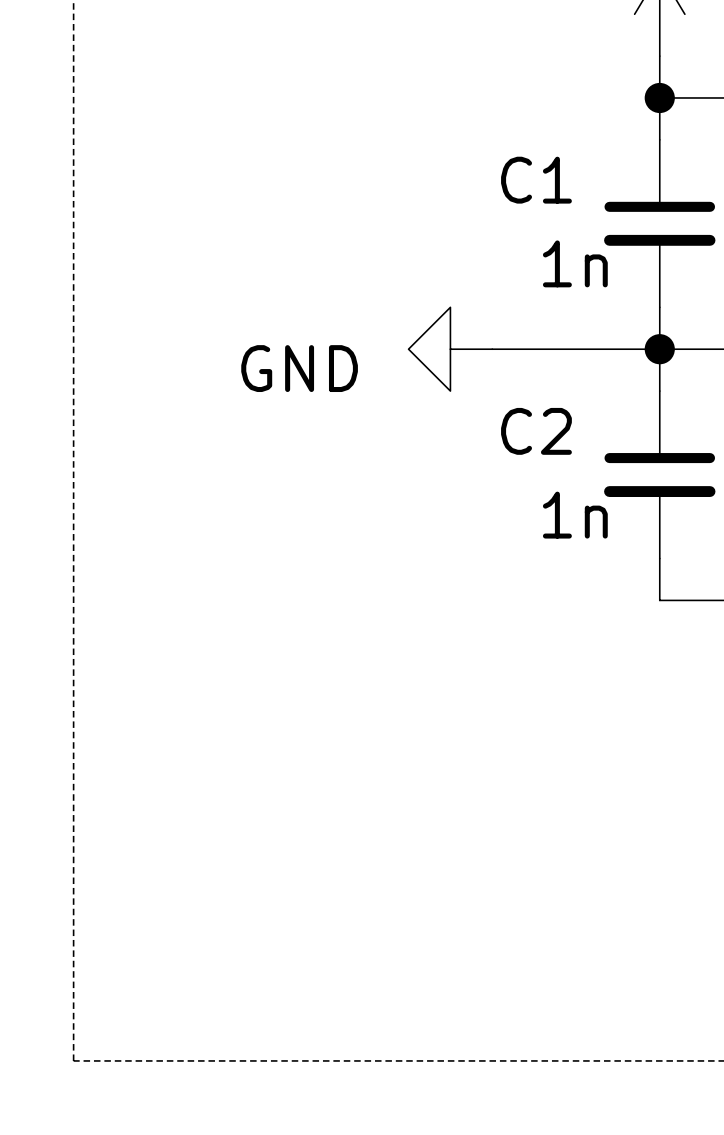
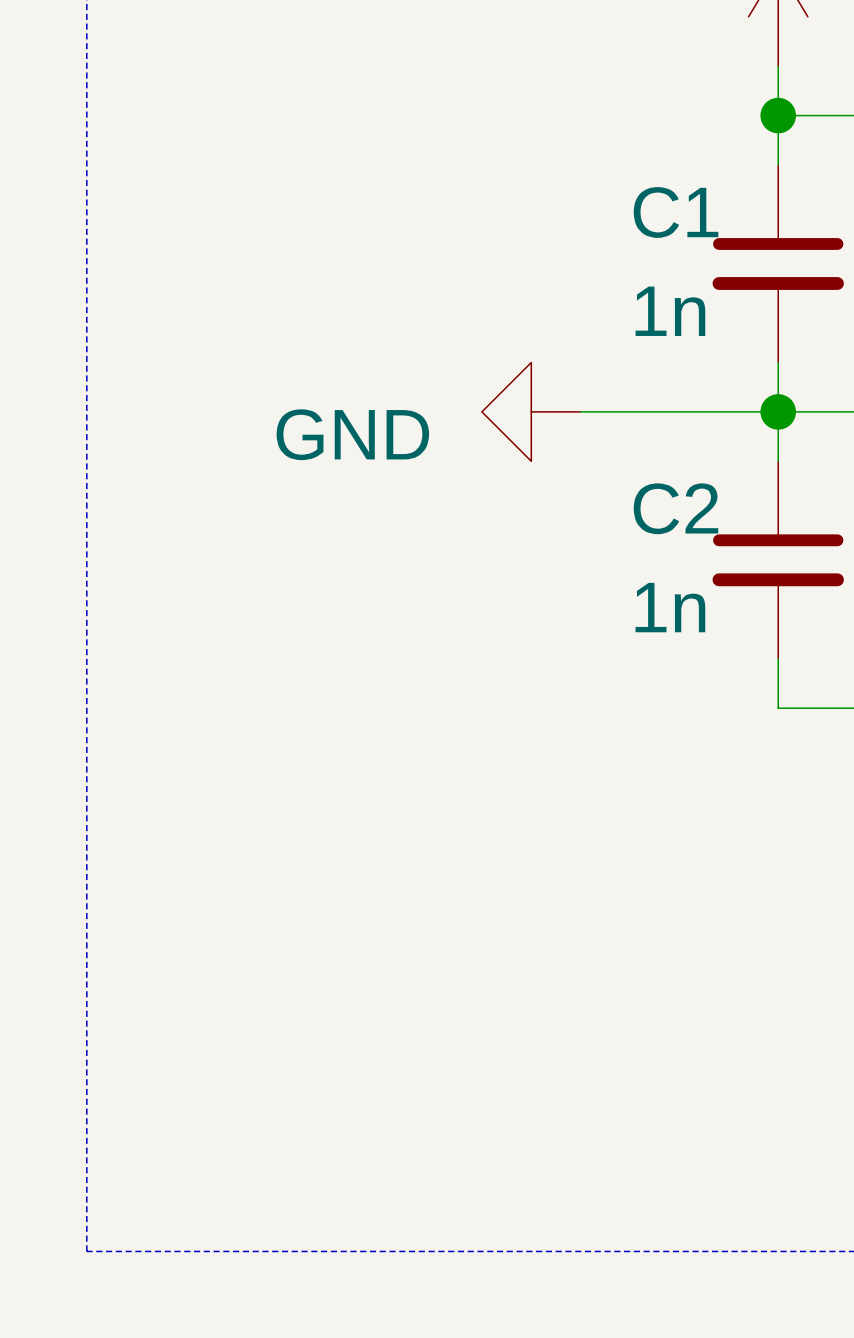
C1 name position: C1 (536, 180) -> C1 (676, 212)
C2 name position: C2 (536, 431) -> C2 (675, 508)

